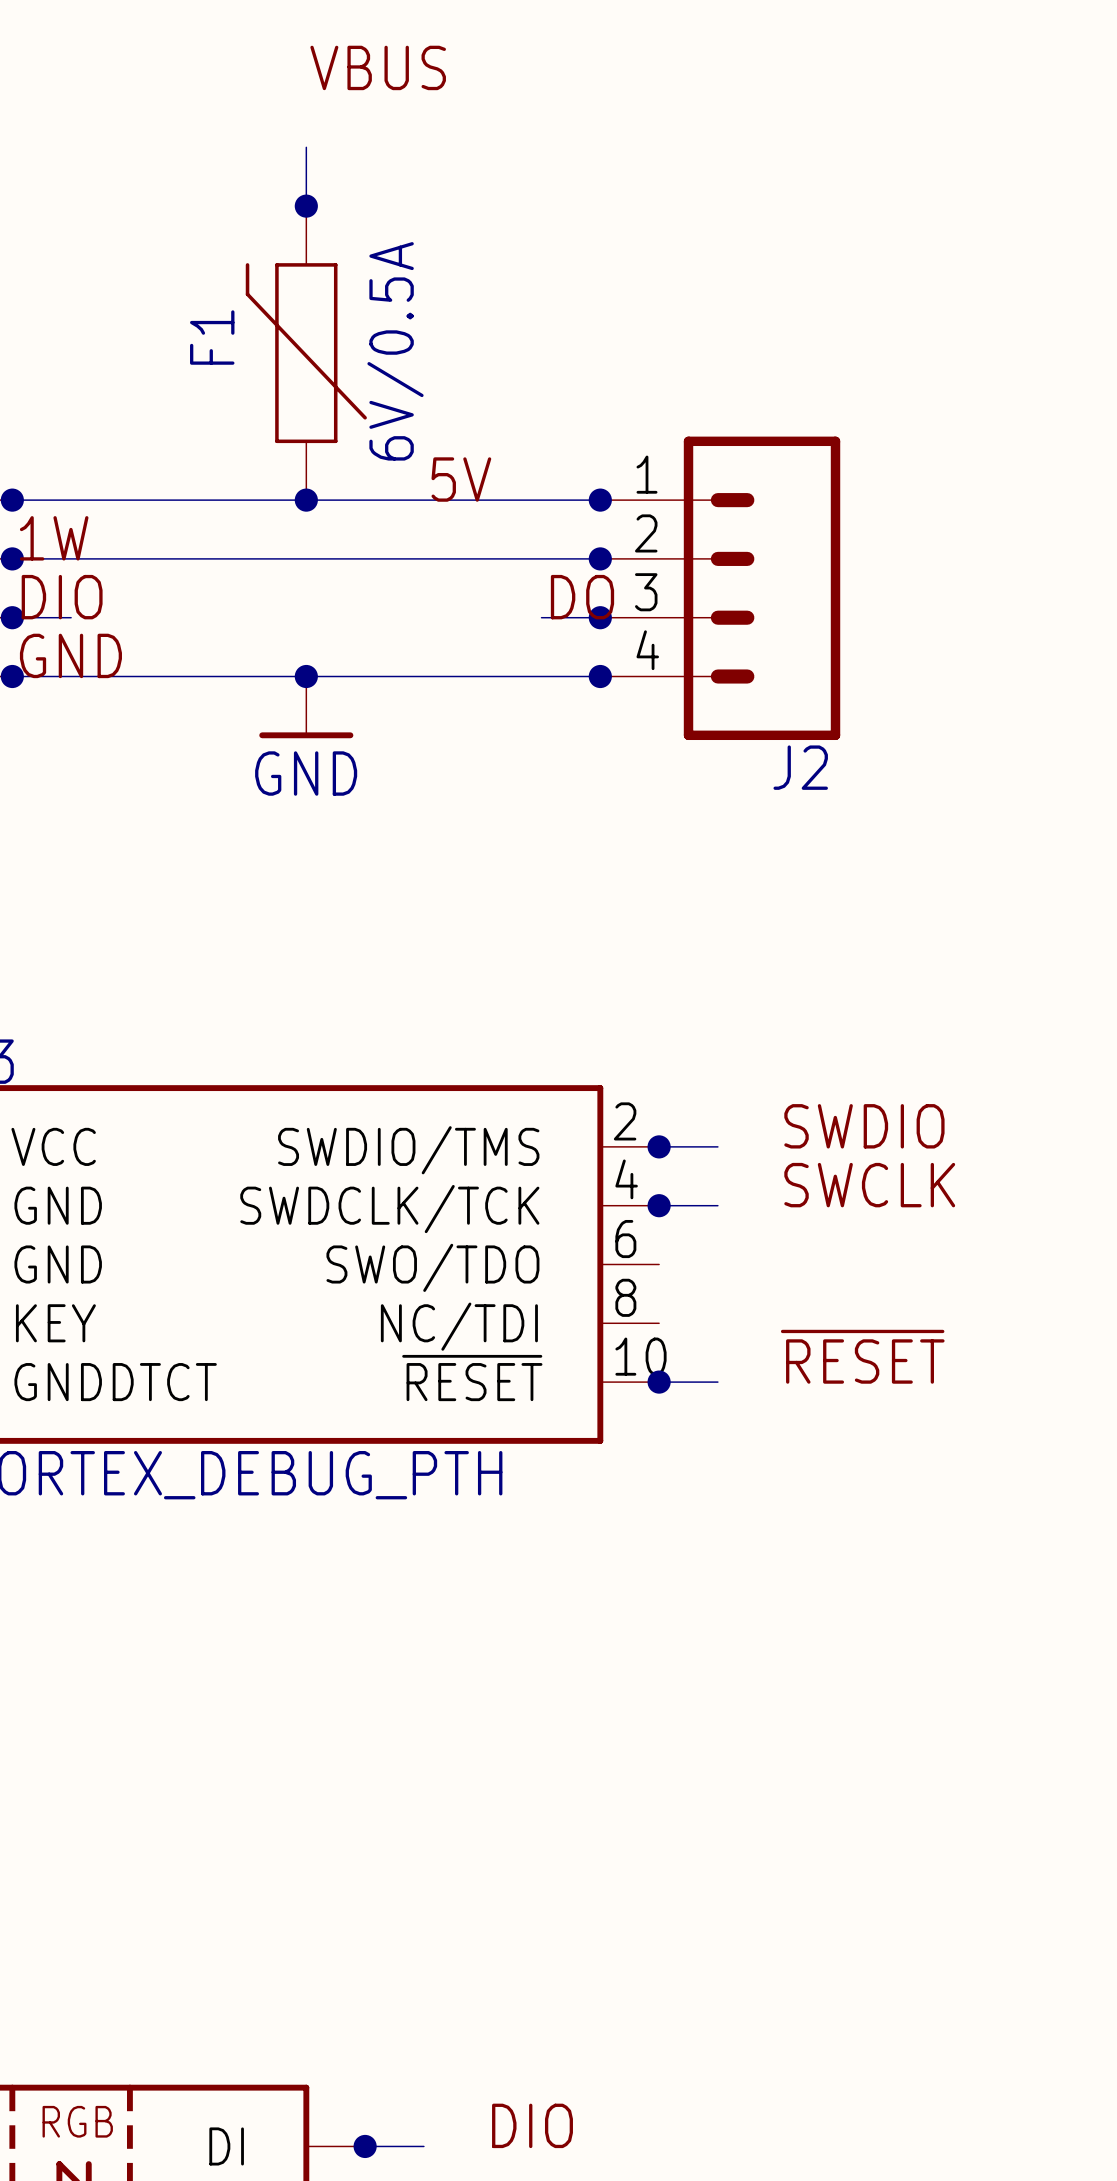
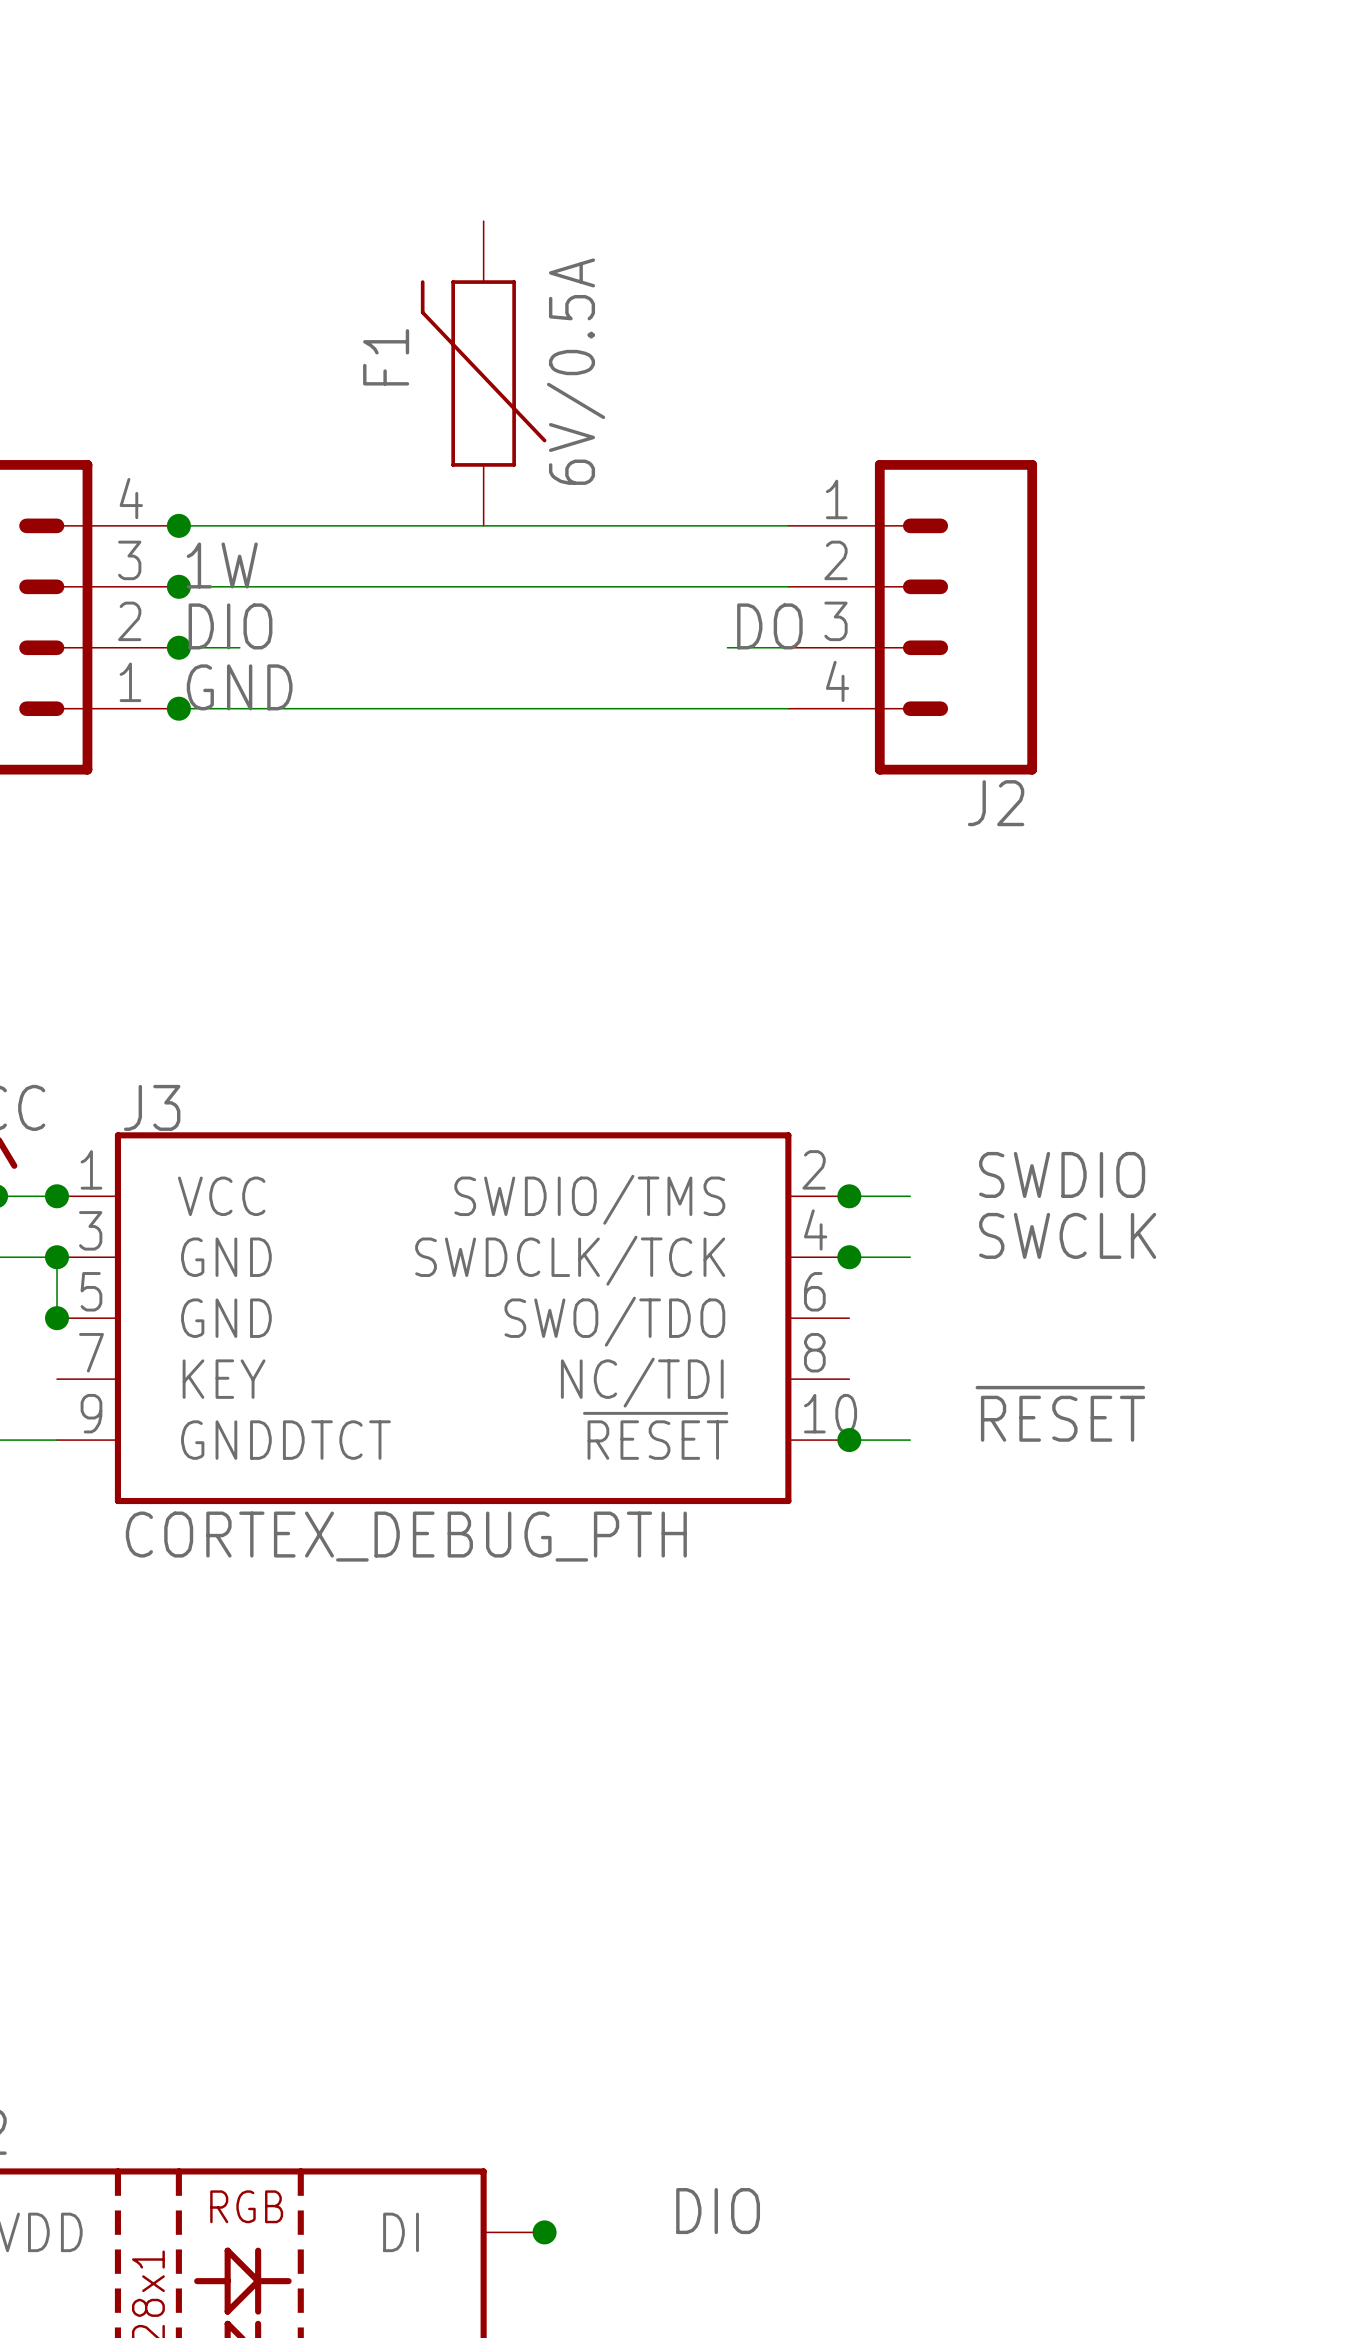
label: VBUS (378, 67) -> none
wire: (306, 147) (306, 206) -> none
junction: (306, 206) -> none
label: 5V (461, 479) -> none
junction: (306, 500) -> none
junction: (600, 500) -> none
junction: (600, 558) -> none
junction: (600, 617) -> none
junction: (306, 676) -> none
junction: (600, 676) -> none
power symbol: GND (306, 707) -> none
wire: (365, 2146) (423, 2146) -> none

